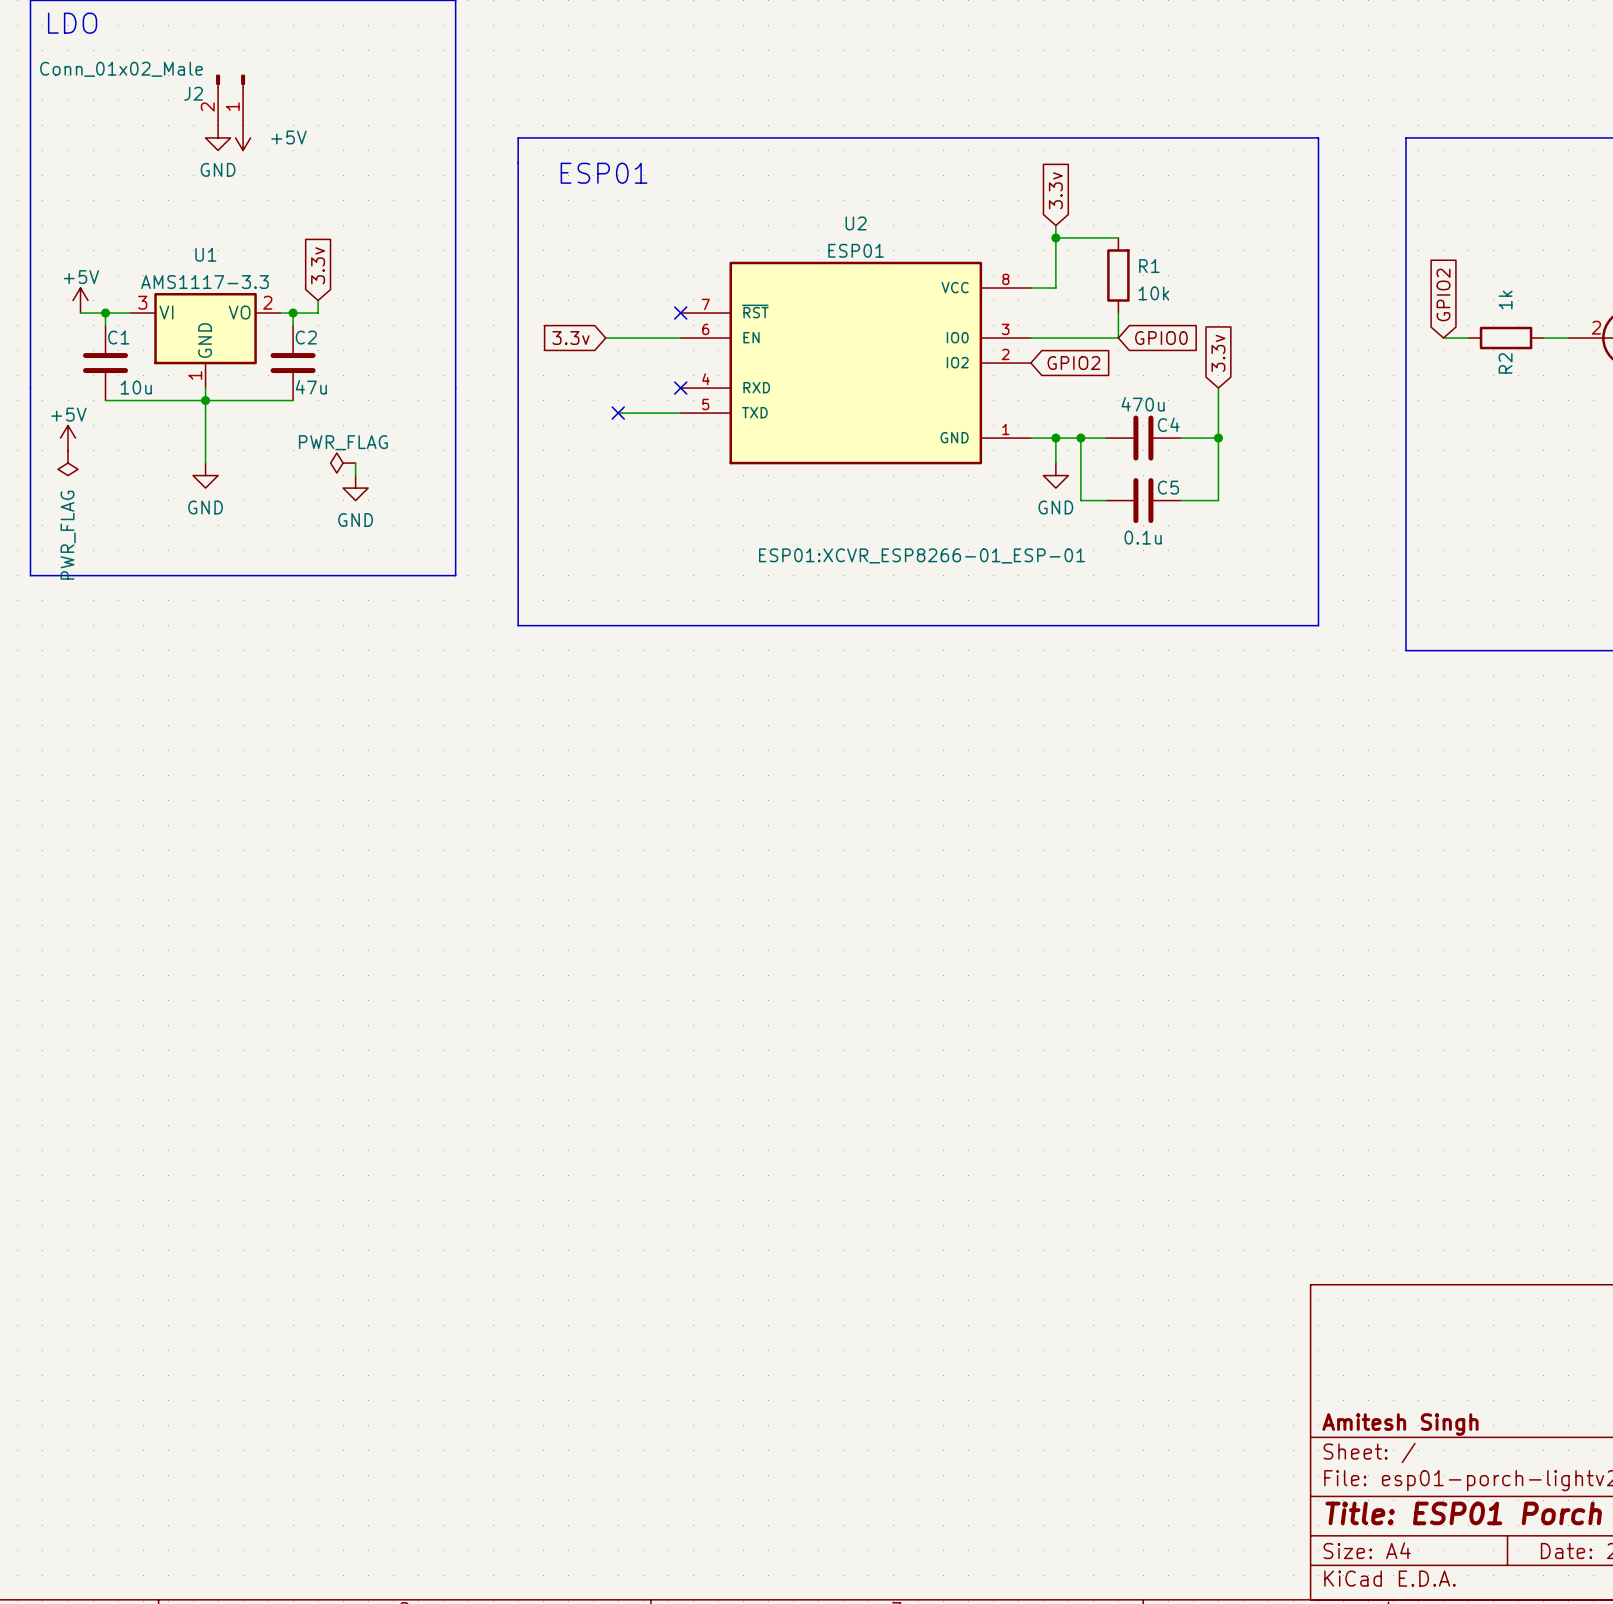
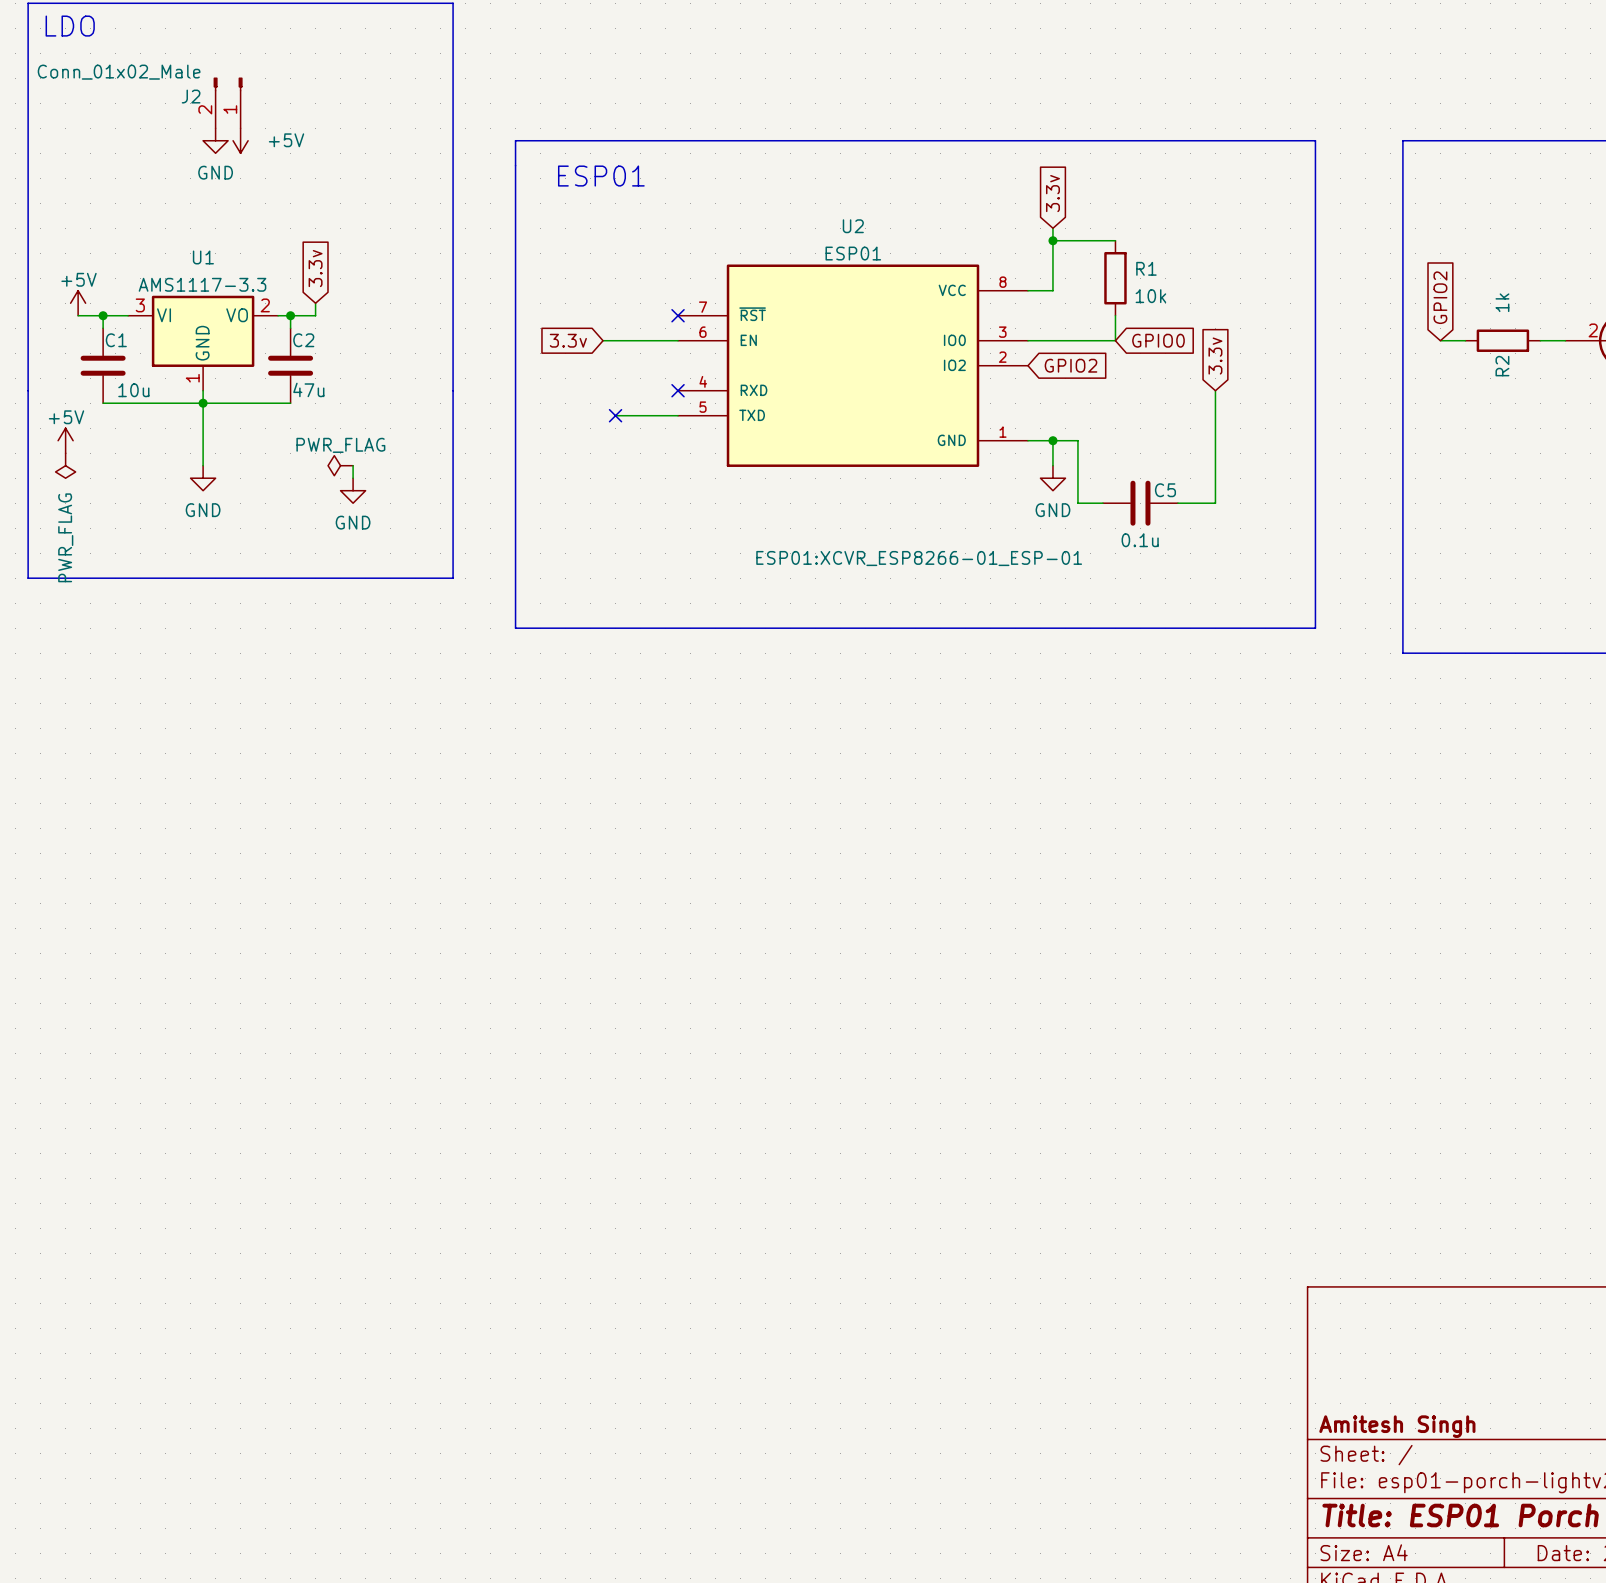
wire: (1080, 438) (1105, 438) -> none
junction: (1080, 438) -> none
C4: 470u (1143, 438) -> none
wire: (1180, 438) (1218, 438) -> none
junction: (1218, 438) -> none

